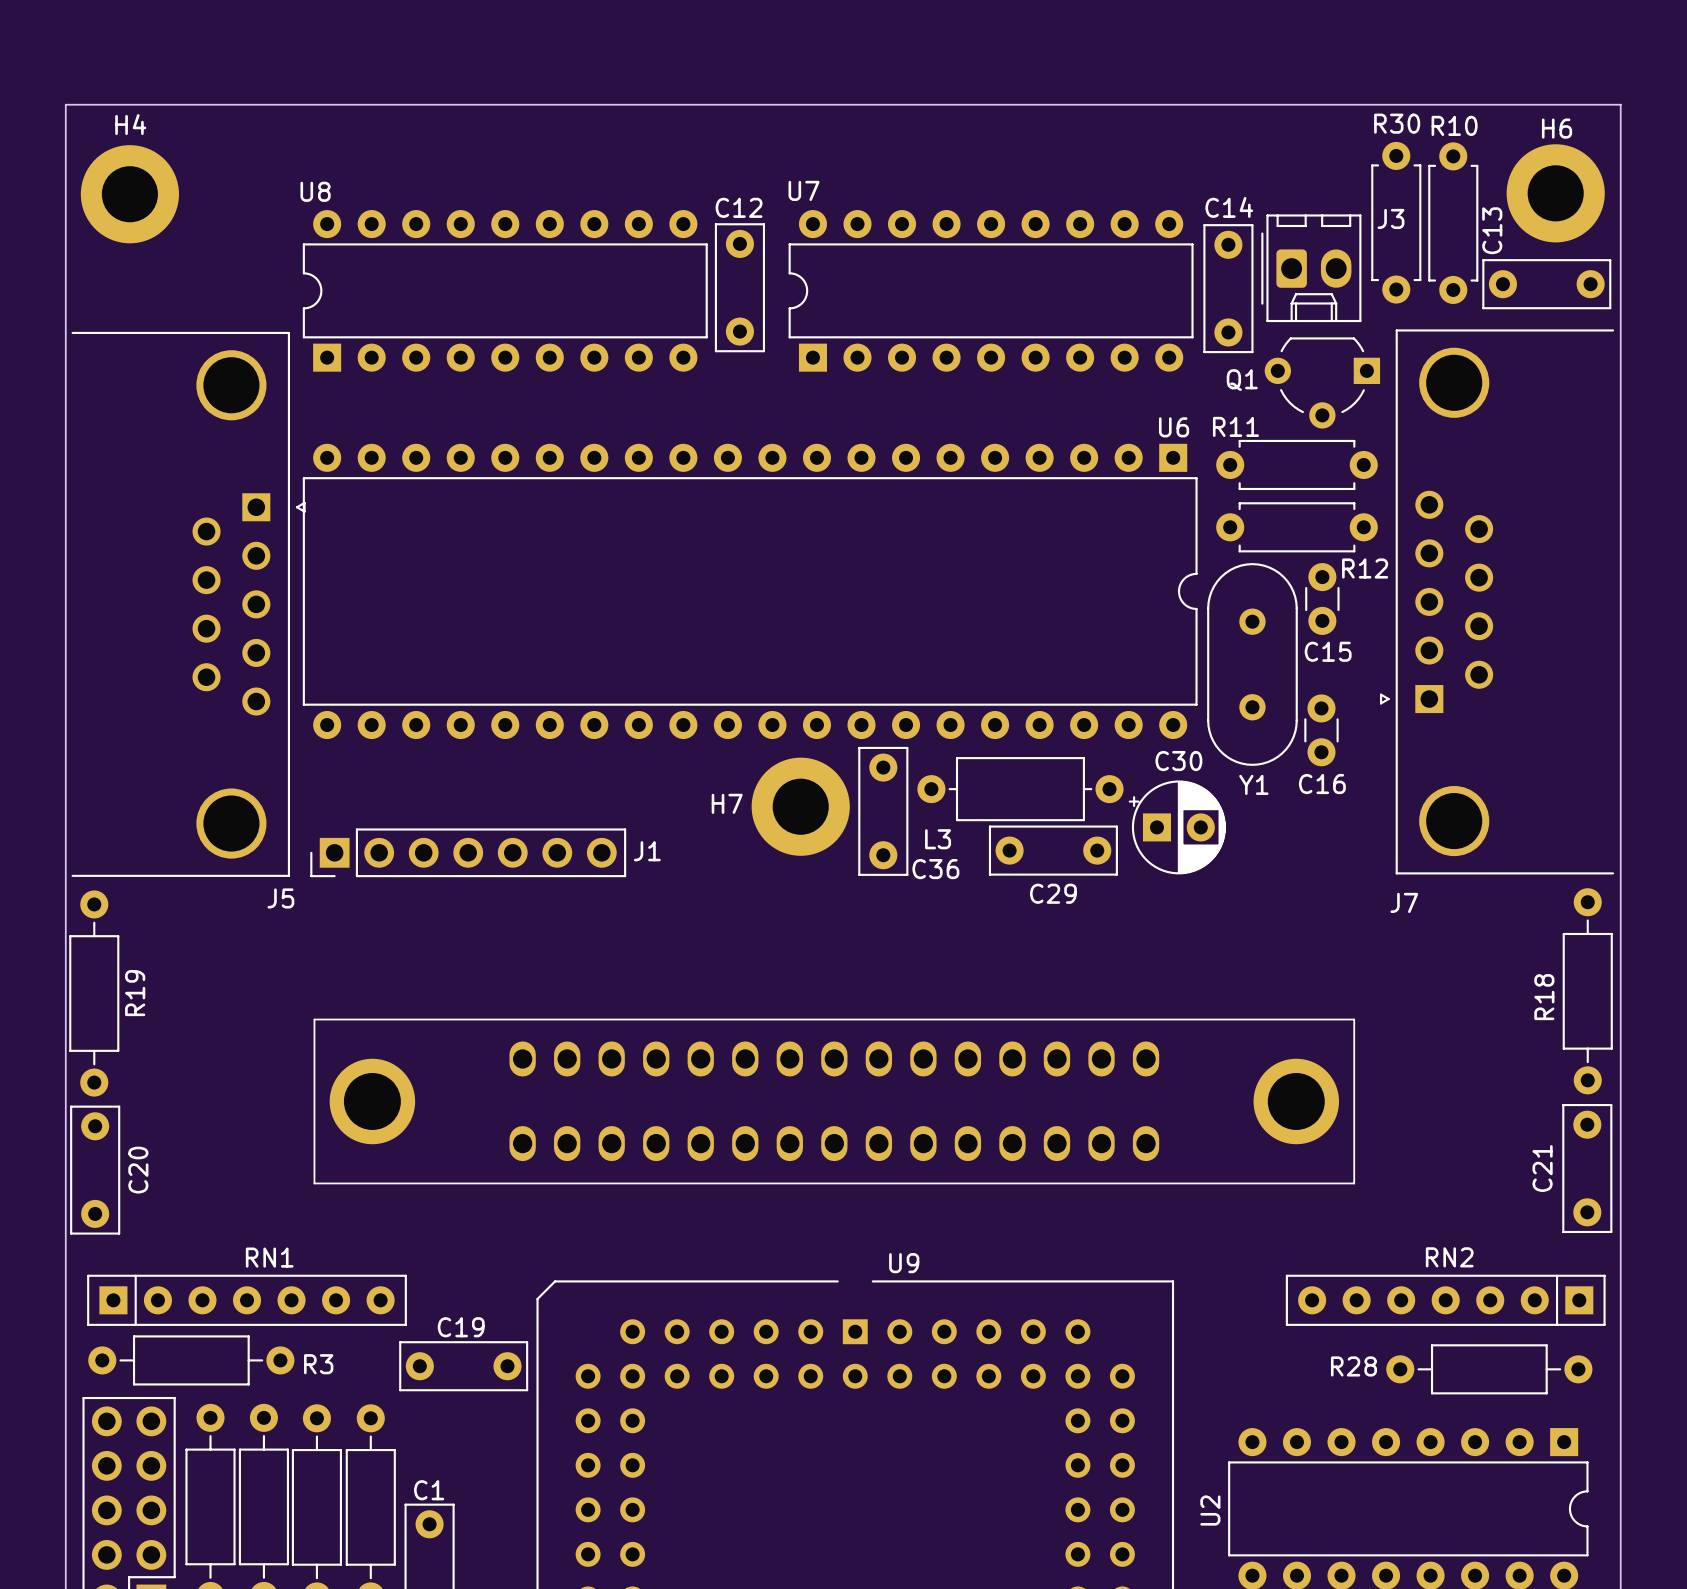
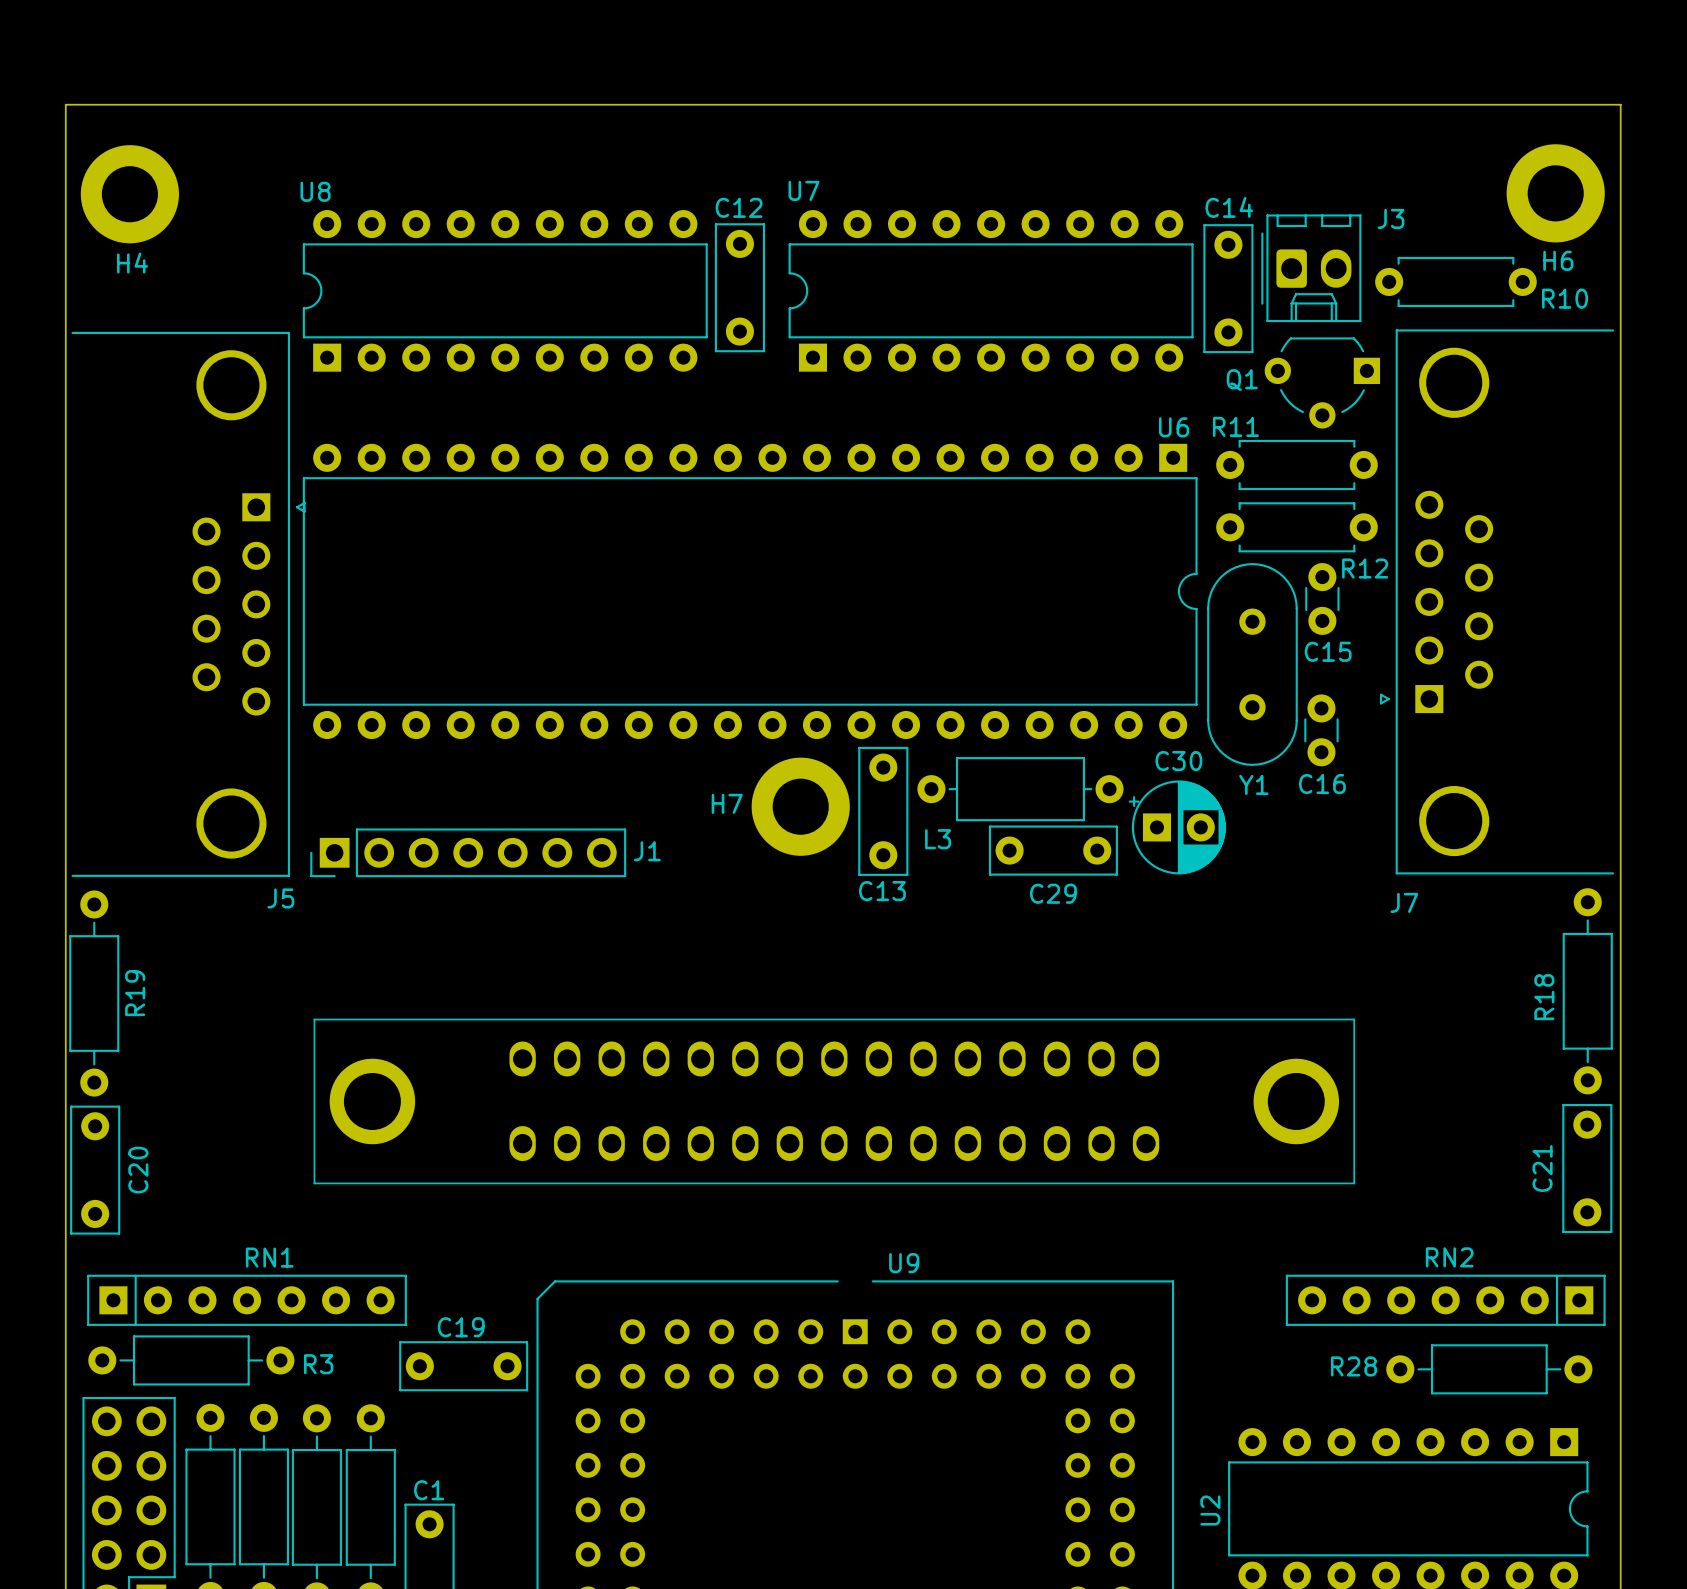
H4 name position: H4 (130, 124) -> H4 (132, 263)
H6 name position: H6 (1557, 128) -> H6 (1558, 260)
R30: (1396, 222) -> none
R10 rotation: 0° (1453, 223) -> 90° clockwise (1455, 281)
C13: (1546, 284) -> none
C36 name: C36 (935, 869) -> C13 (882, 891)

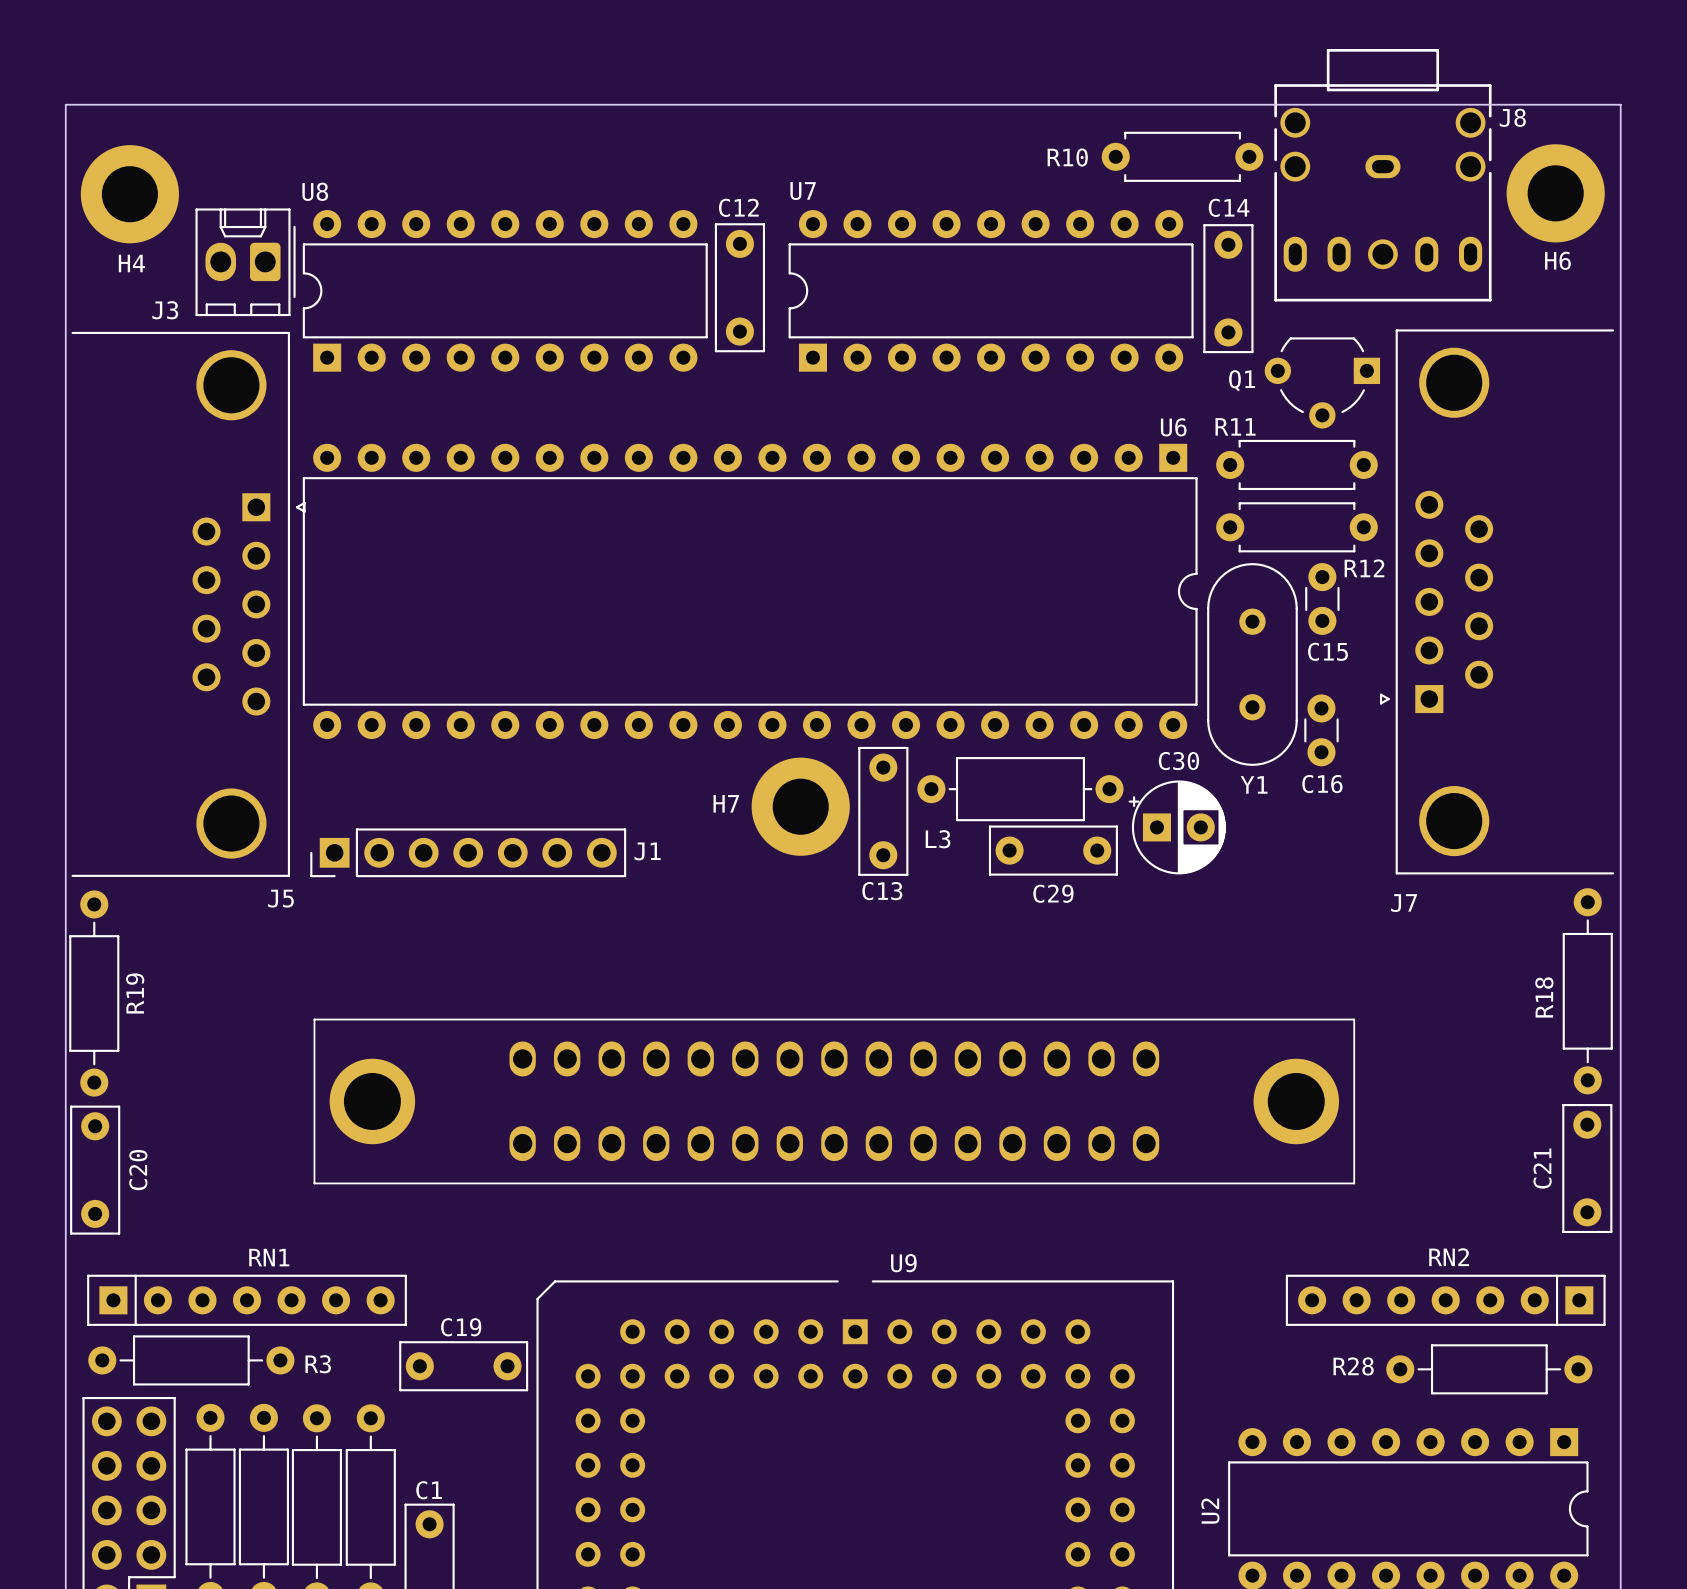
J8: none -> (1382, 175)
J3 rotation: 0° (1311, 268) -> 180° (245, 262)
J3 position: (1311, 268) -> (245, 262)
R10 position: (1455, 281) -> (1182, 156)
R10 name position: R10 (1565, 298) -> R10 (1067, 157)

